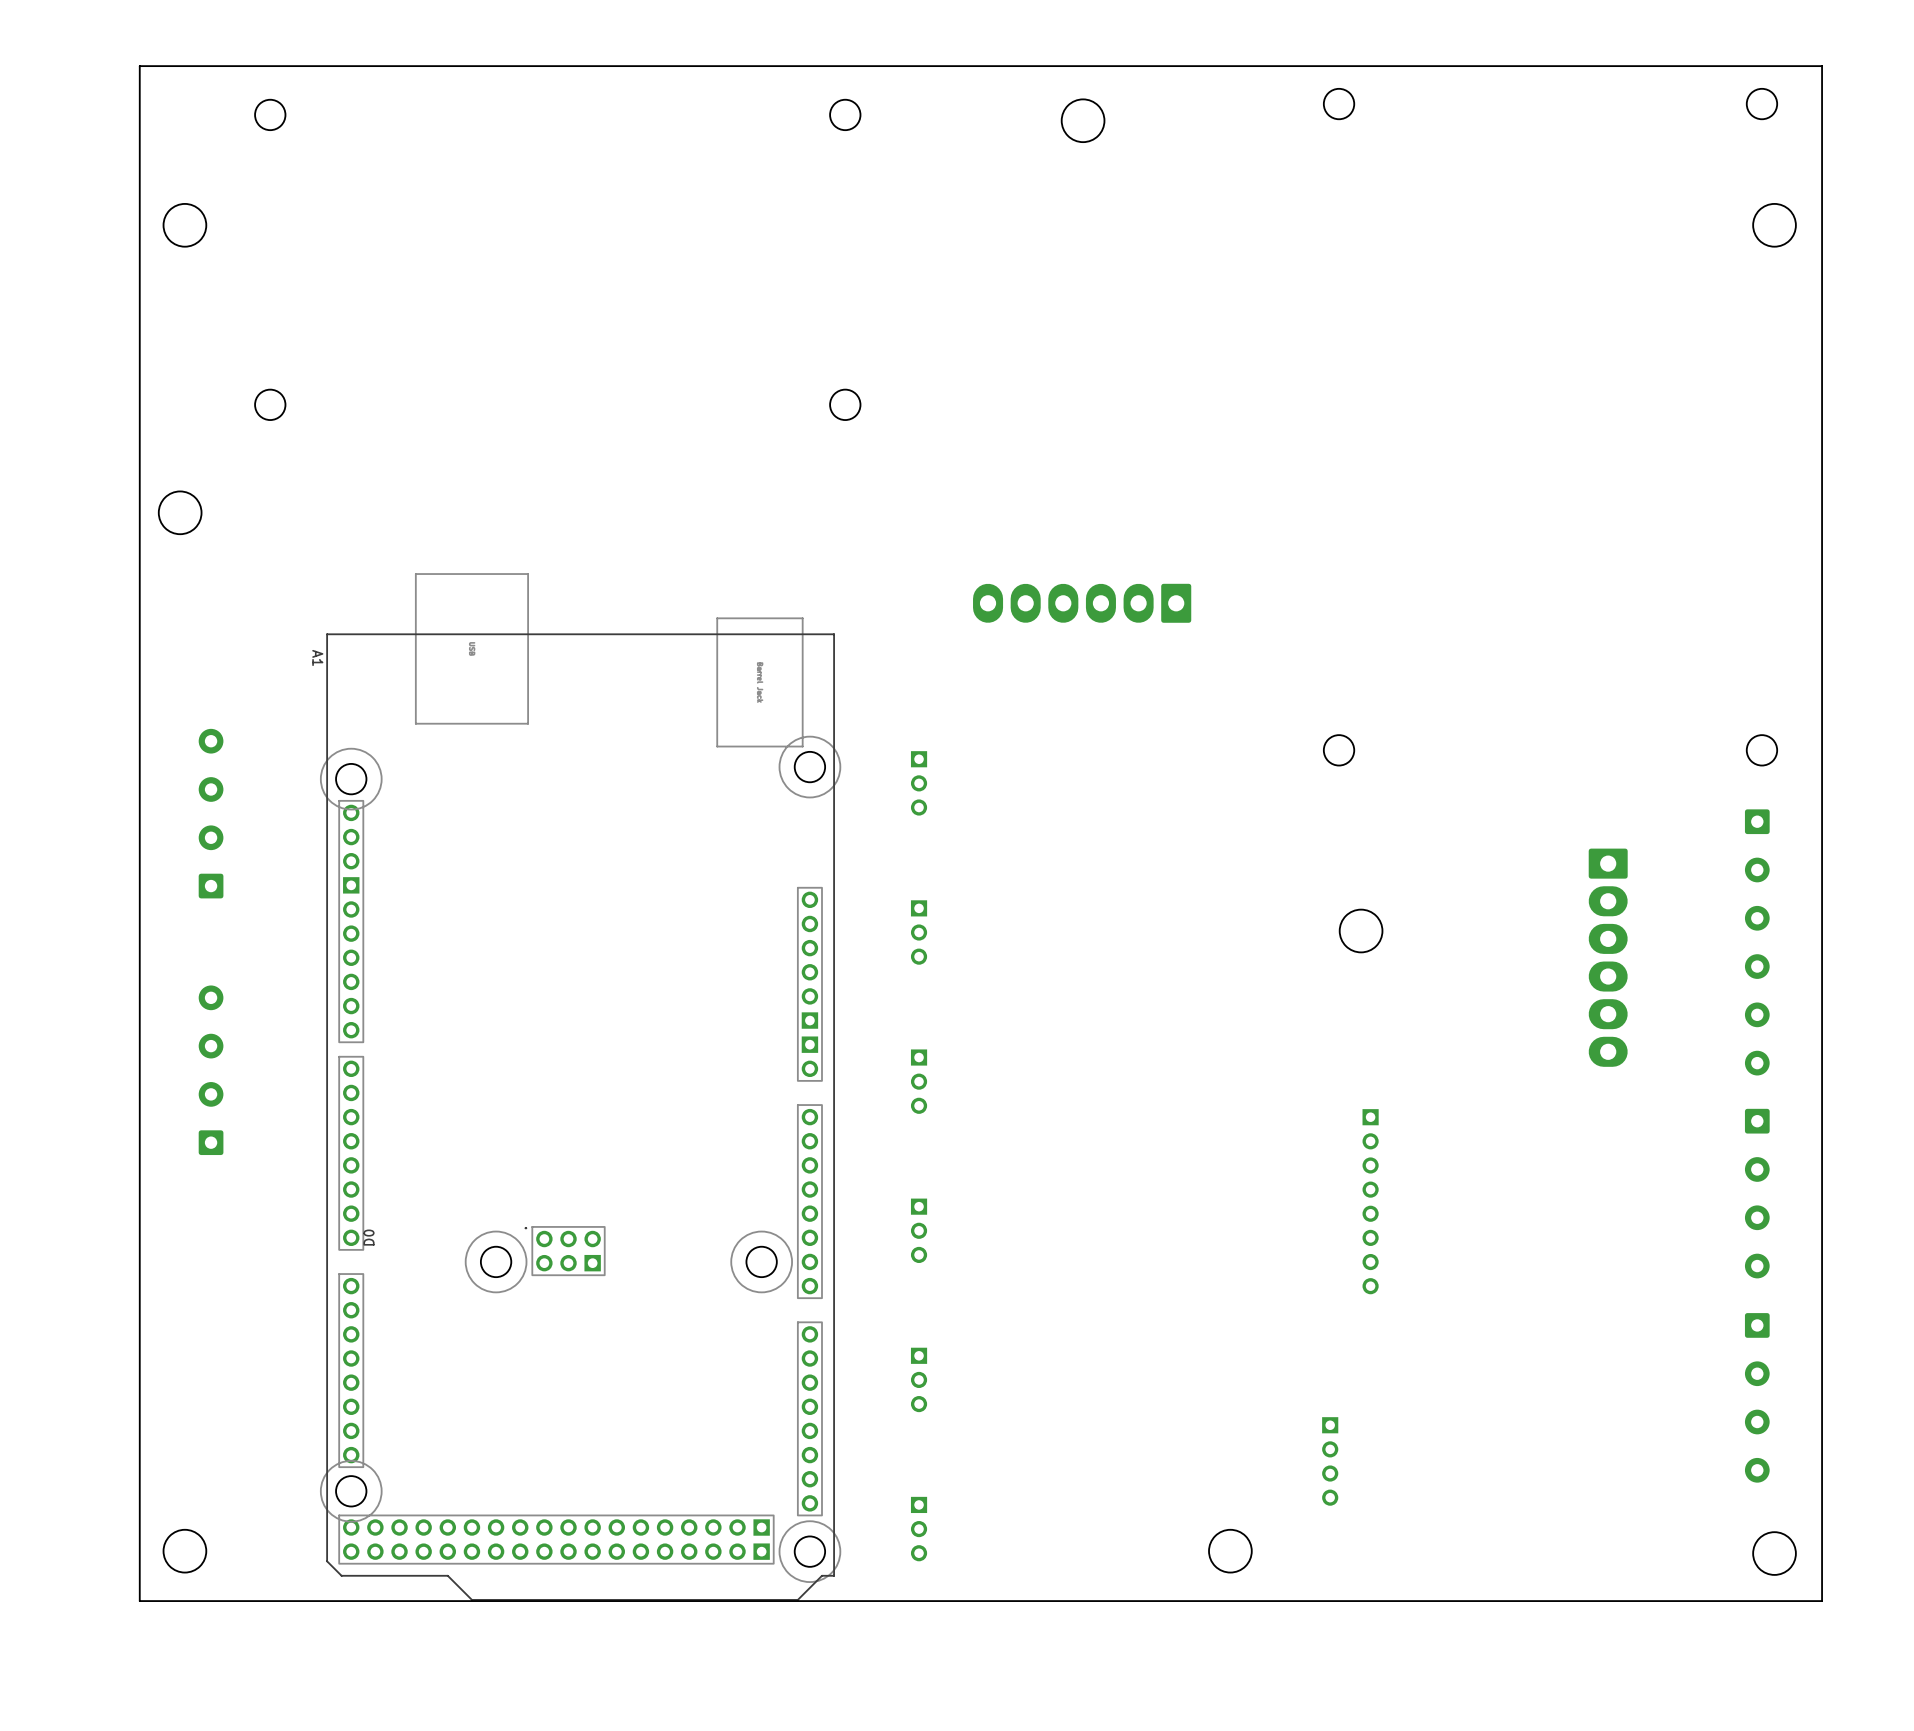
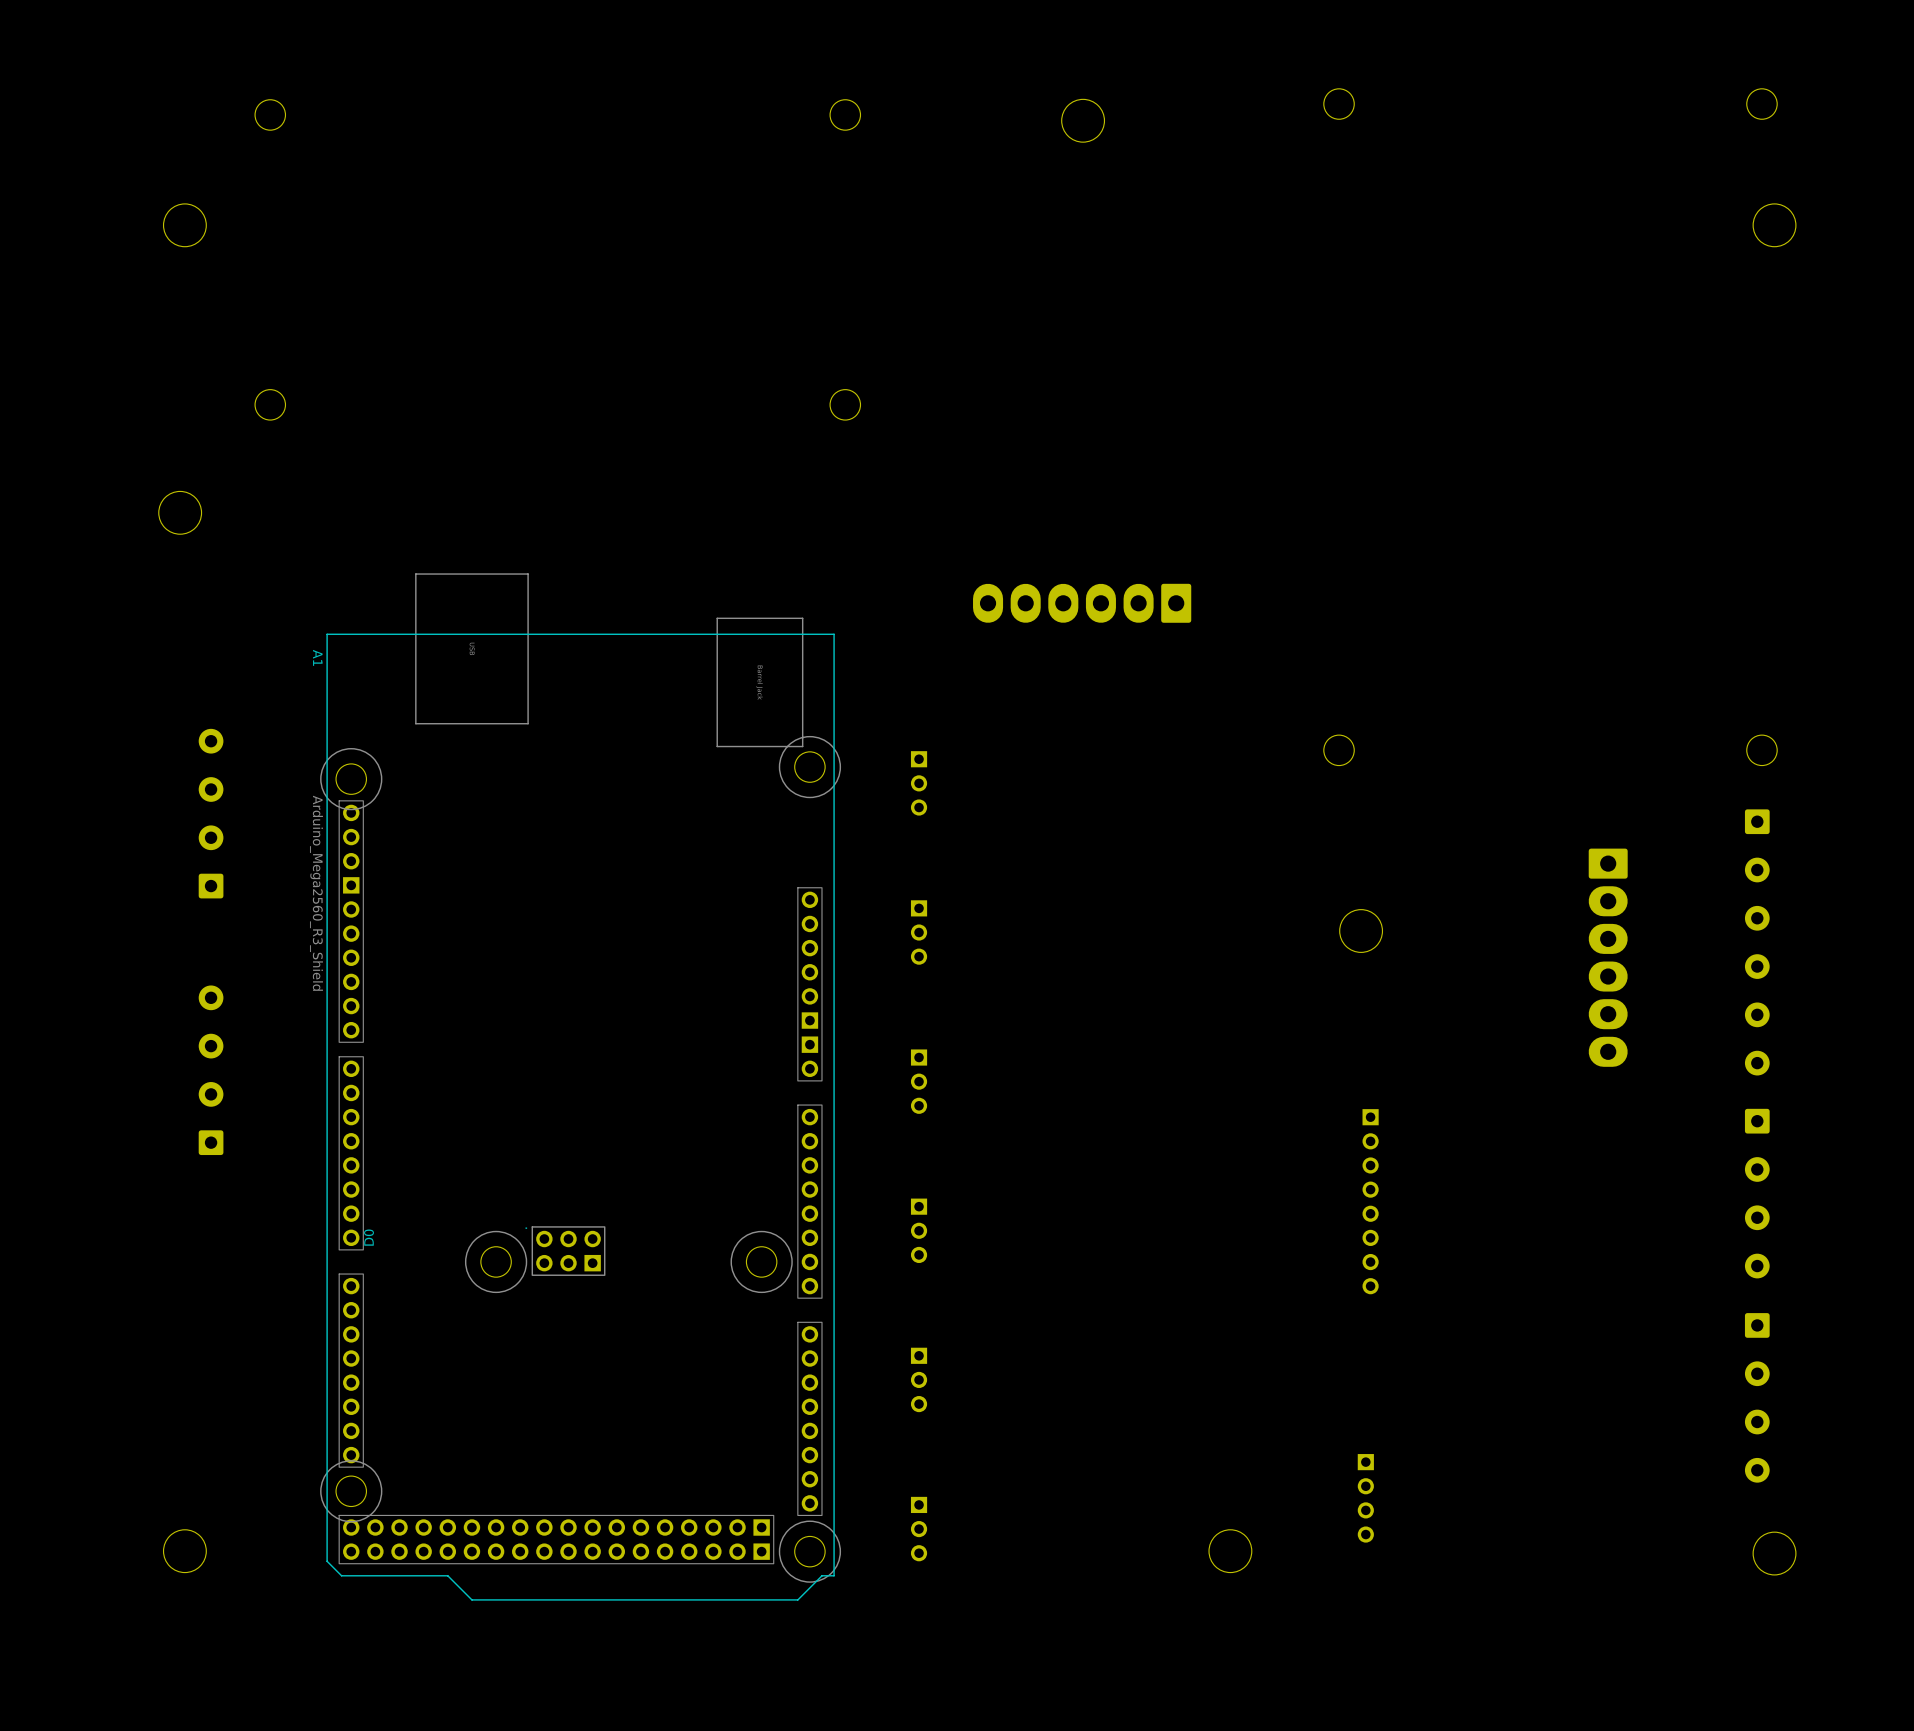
board edge: (1822, 66) (139, 66) (139, 1601) (1822, 1601) (1822, 66) -> none
A1 value: none -> Arduino_Mega2560_R3_Shield (316, 893)
part position: (1330, 1461) -> (1365, 1498)

